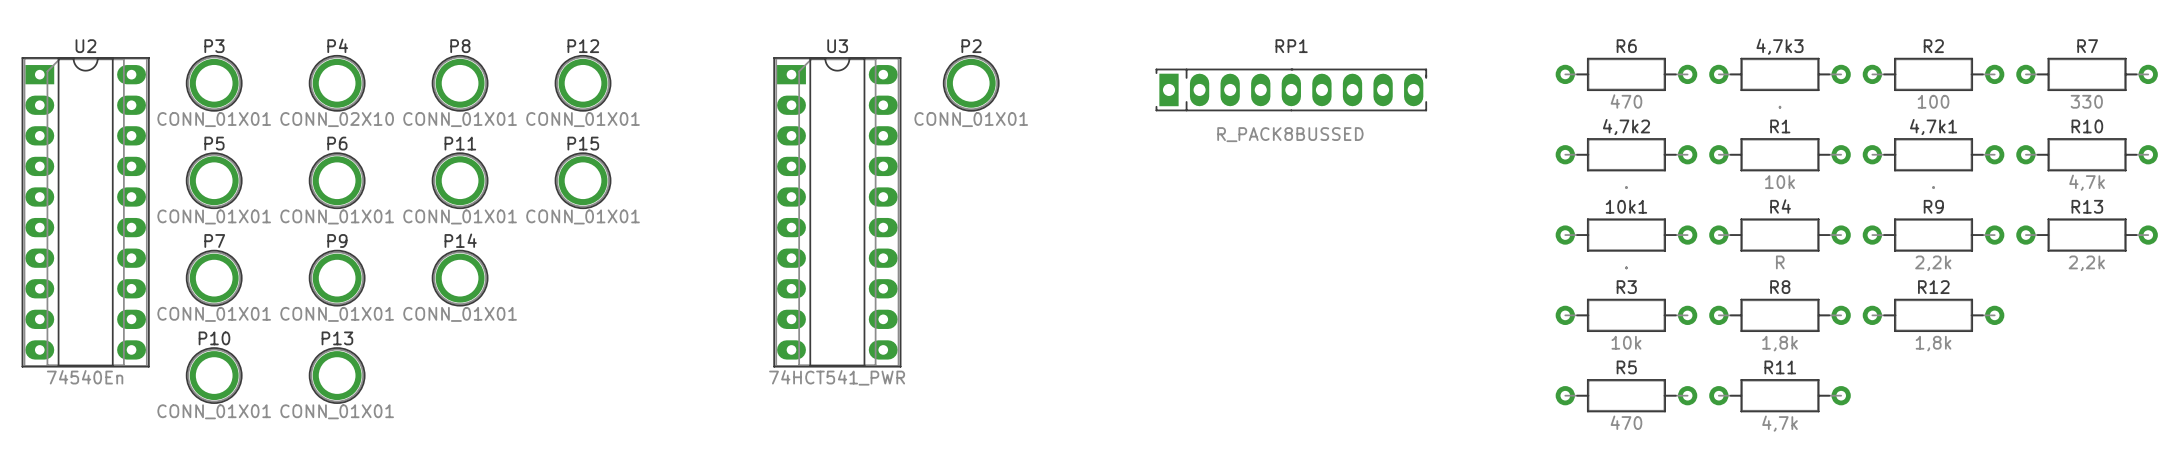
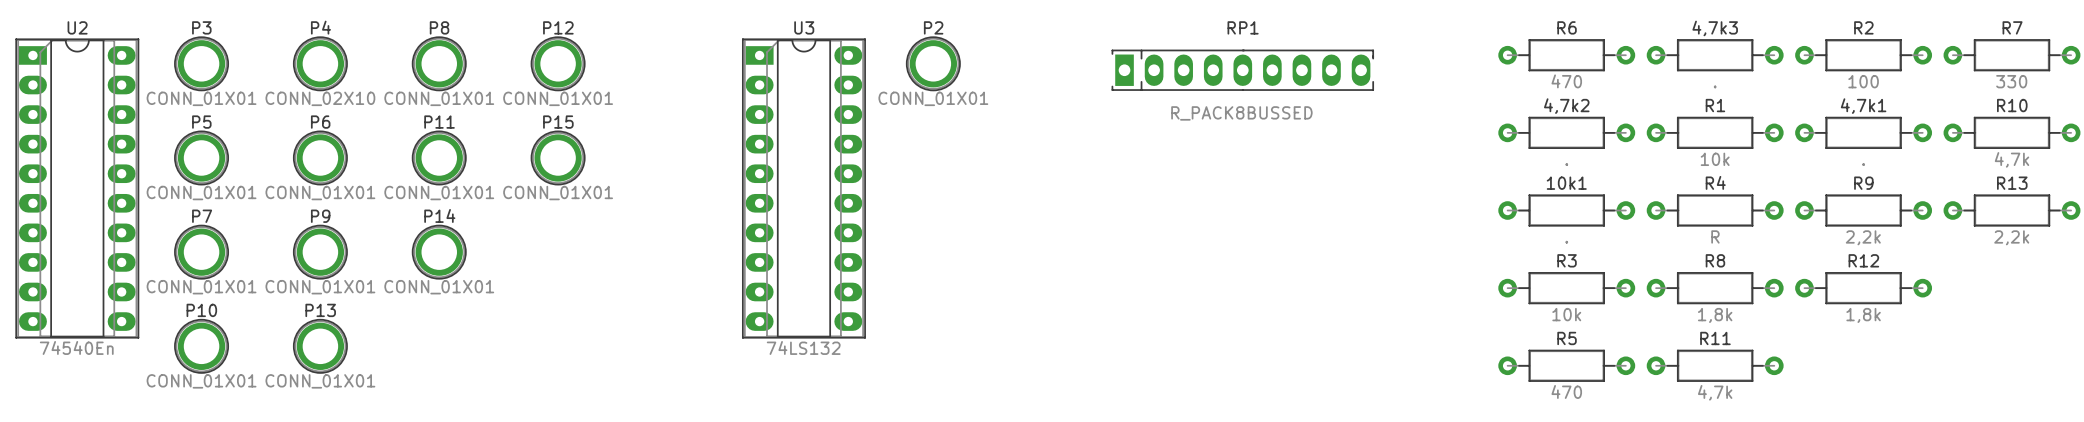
U3 value: 74HCT541_PWR (837, 377) -> 74LS132 (803, 347)

